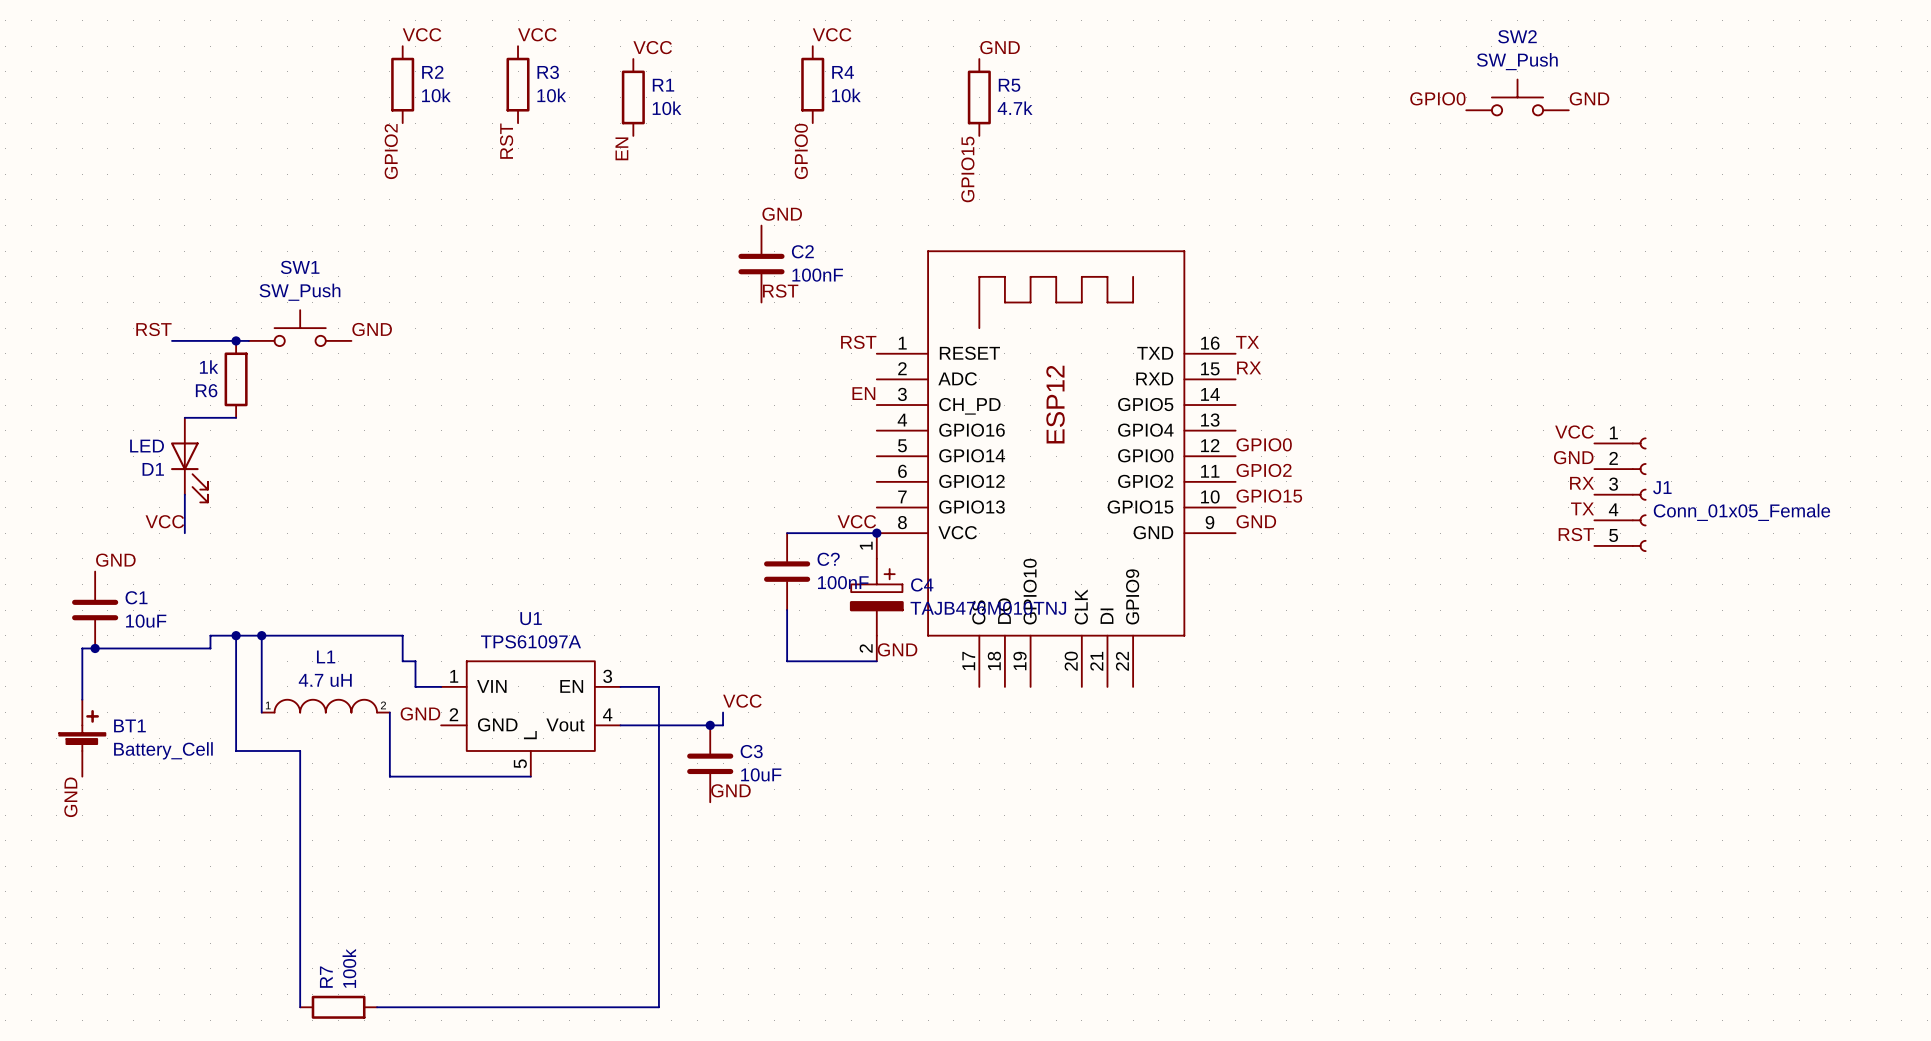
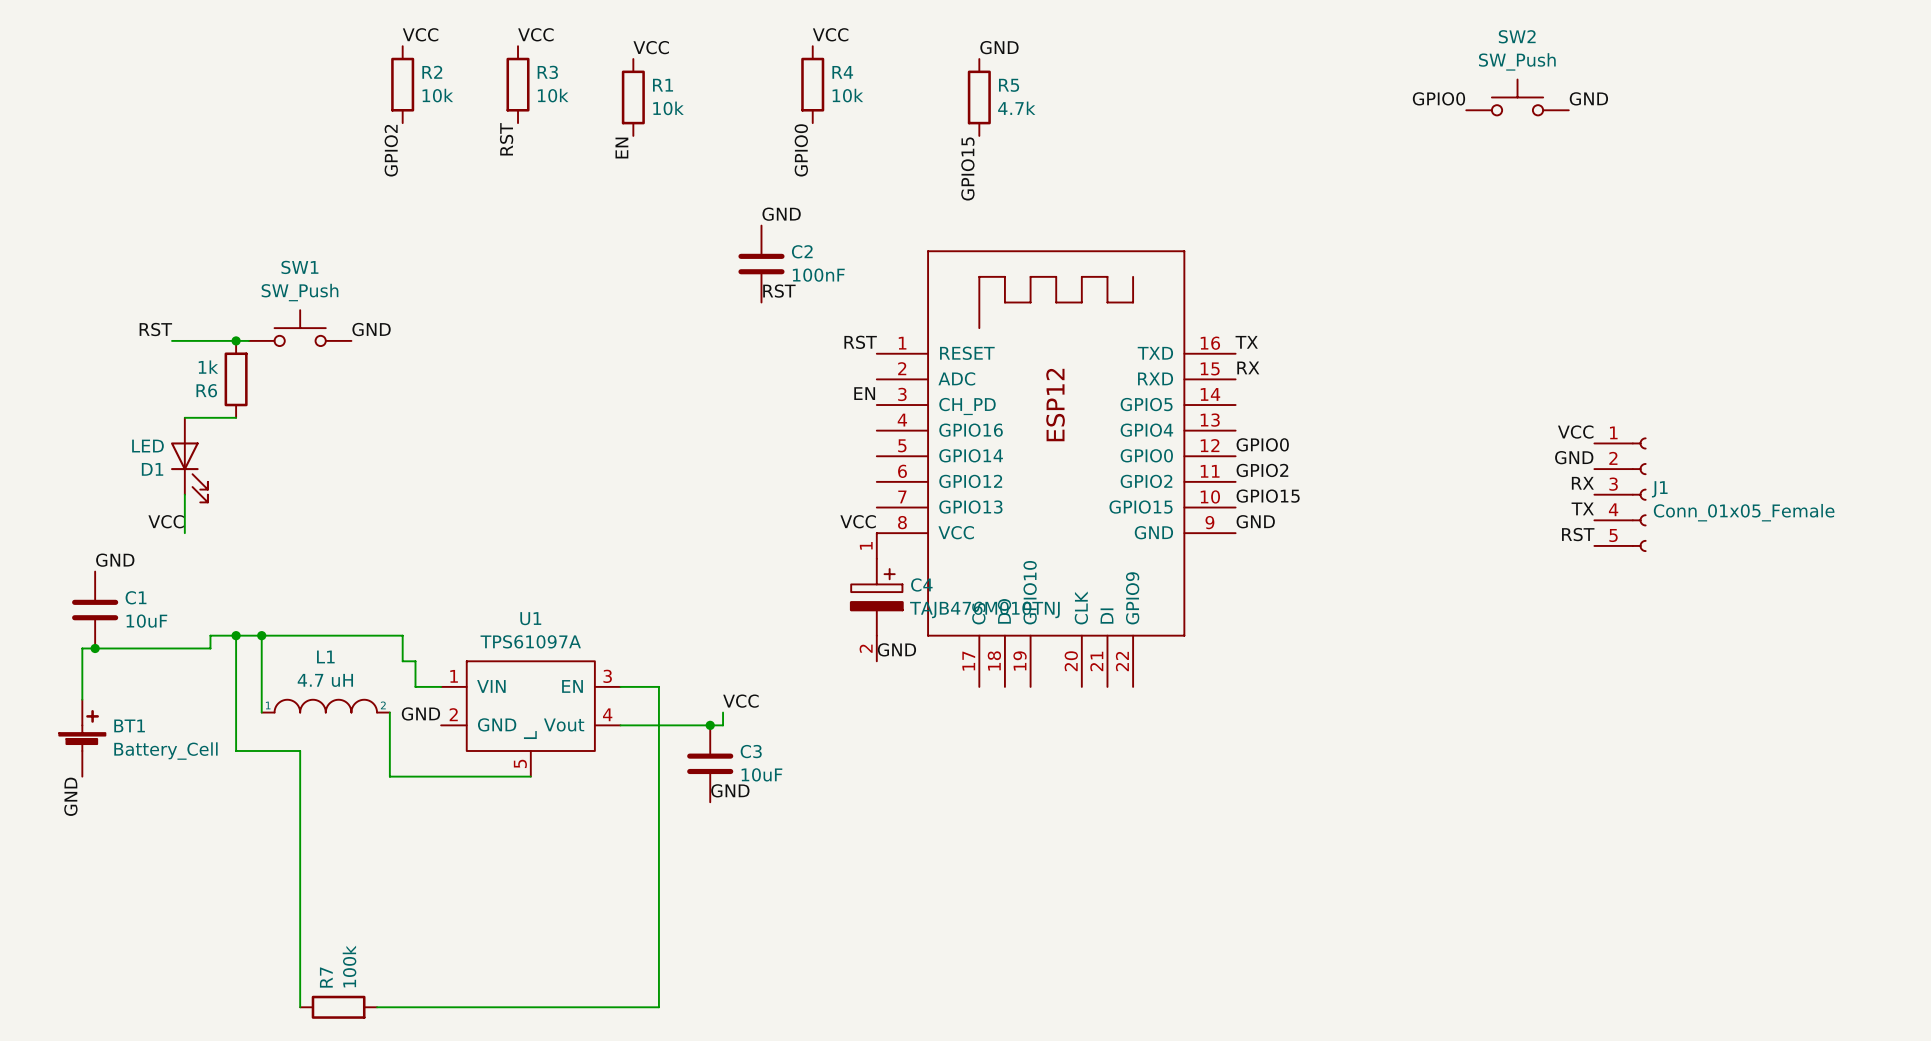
wire: (787, 533) (876, 533) -> none
junction: (876, 533) -> none
C?: 100nF (787, 571) -> none
wire: (787, 610) (787, 661) (876, 661) -> none

